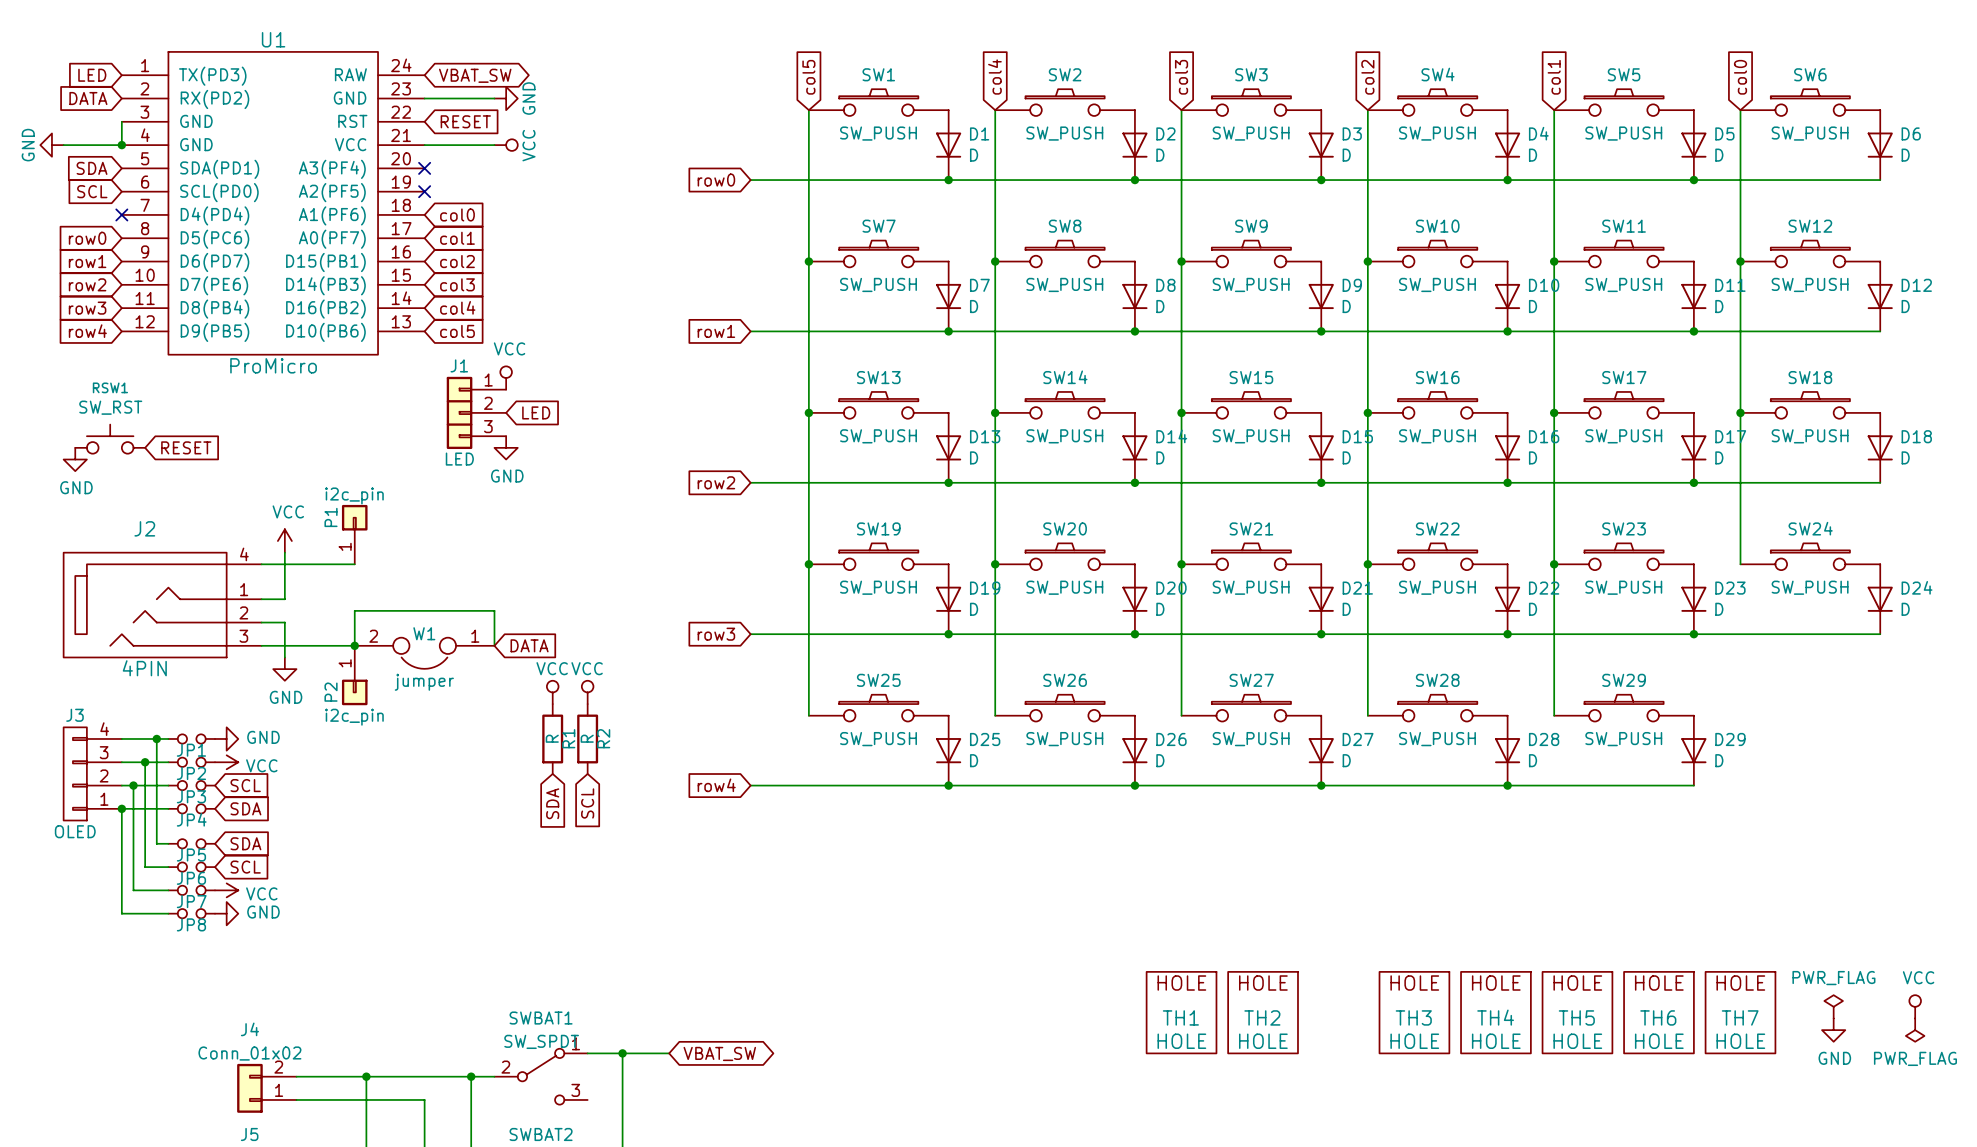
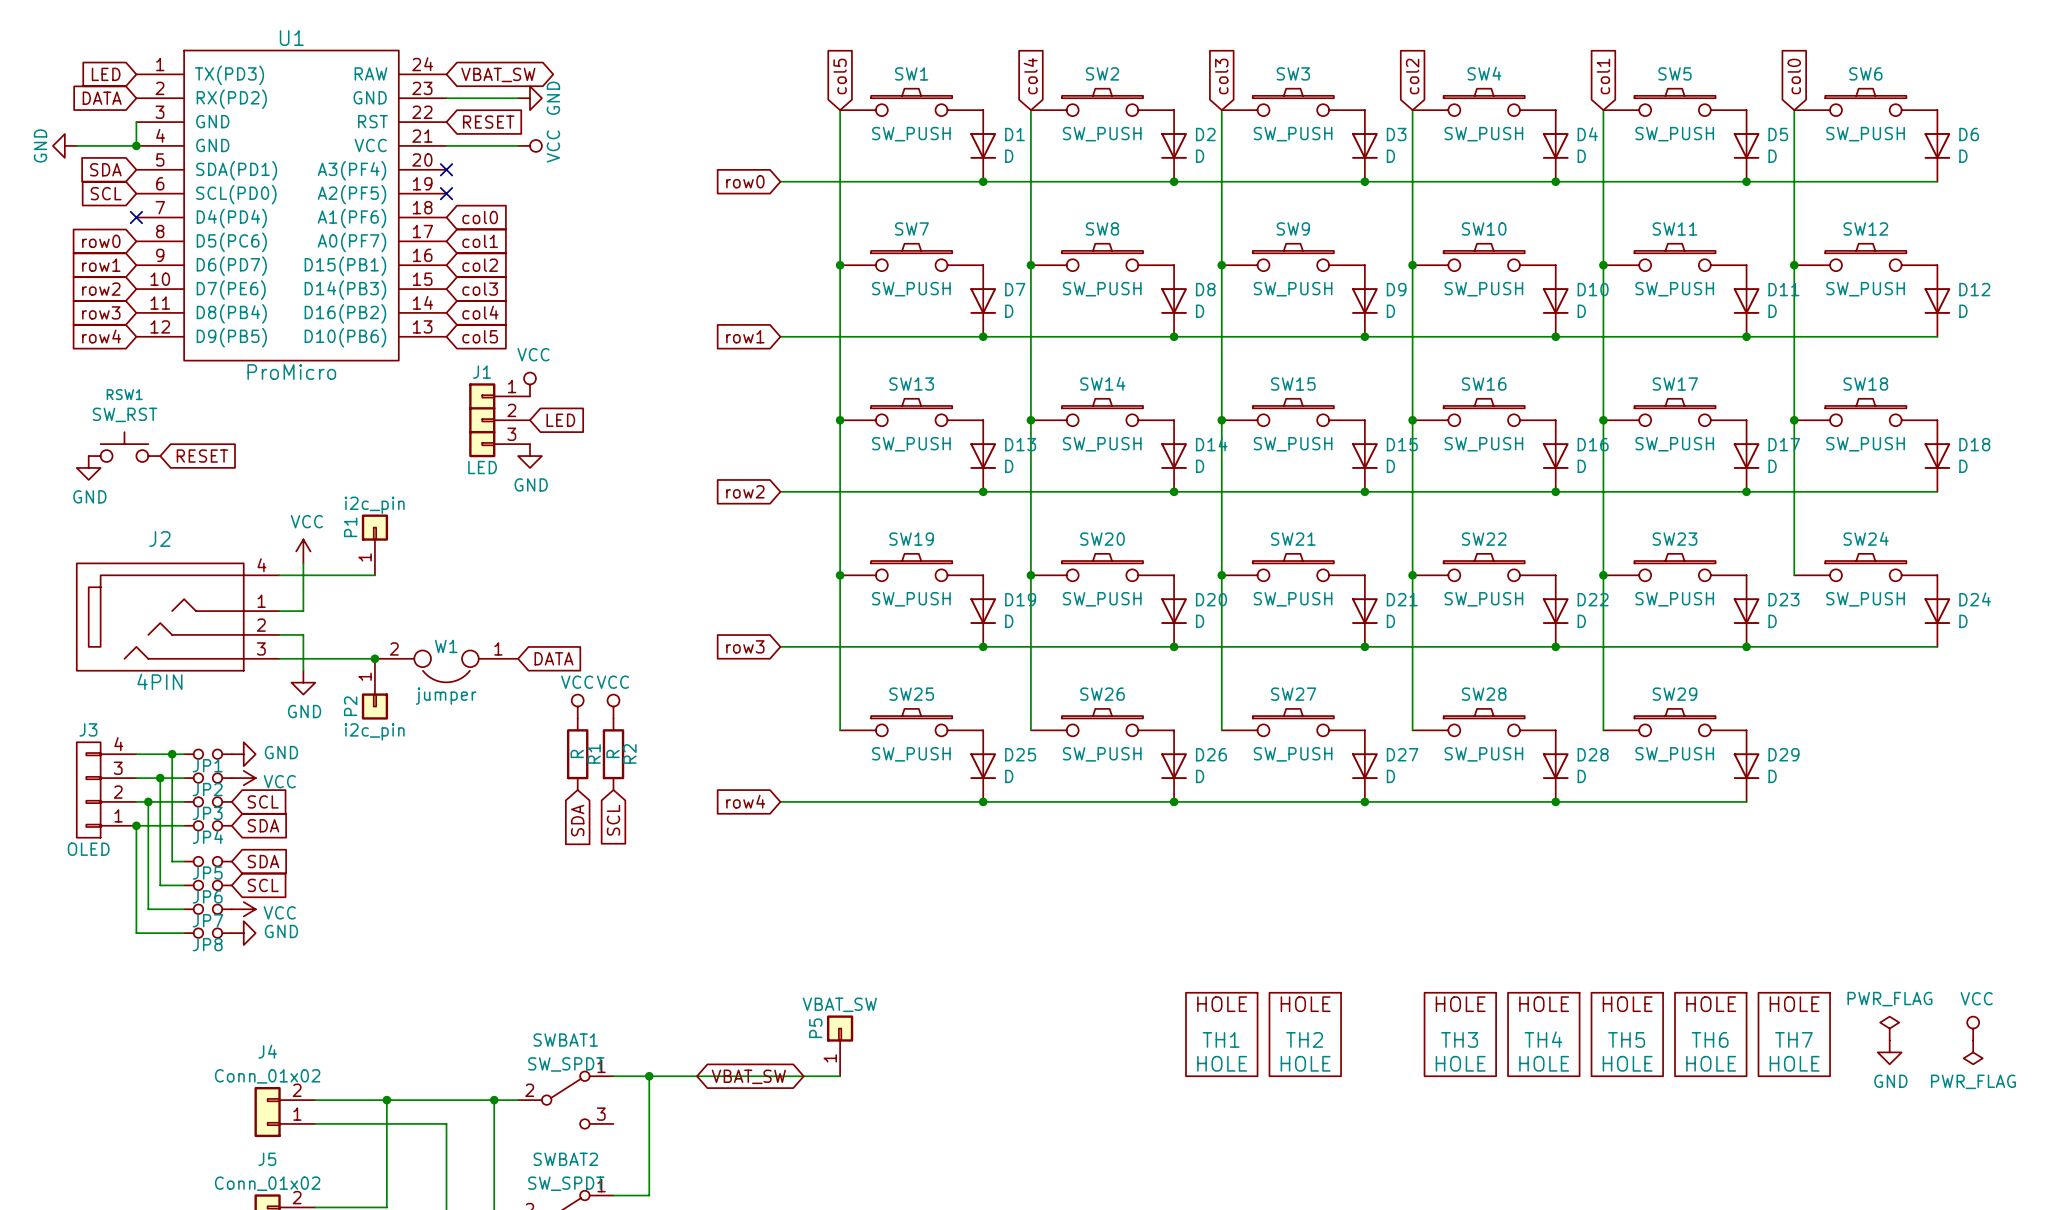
wire: (354, 645) (354, 610) (494, 610) (494, 645) -> none
P5: none -> VBAT_SW (840, 1045)
wire: none -> (696, 1076) (840, 1076)

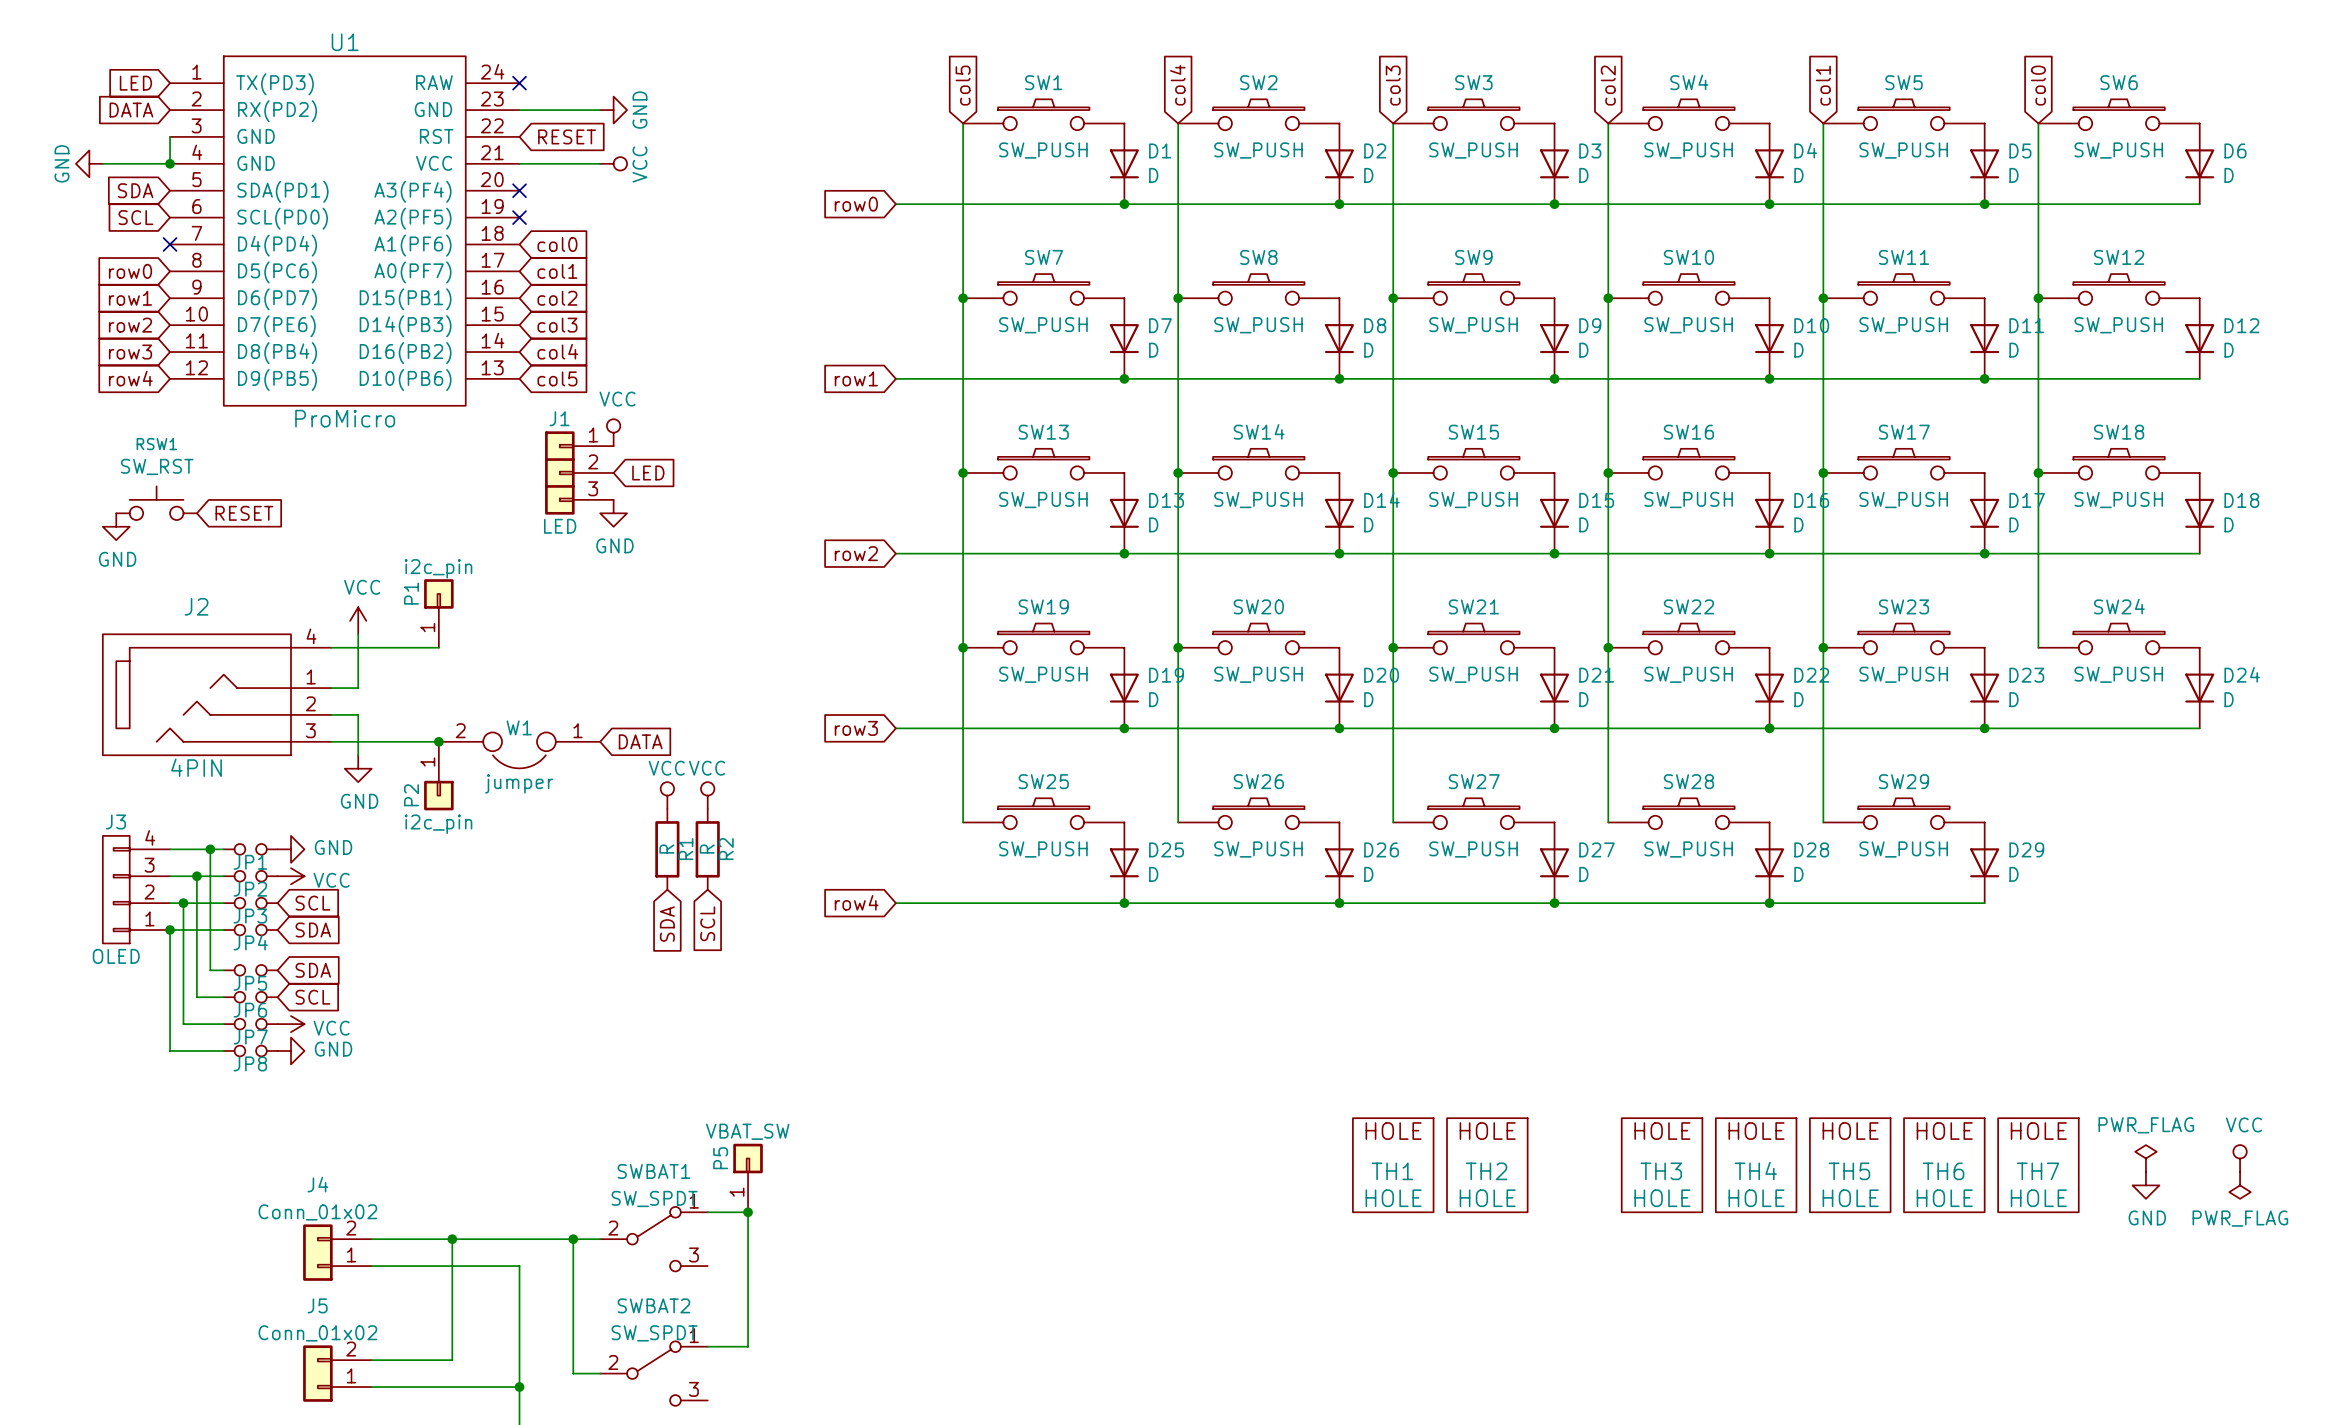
no-connect mark: none -> (519, 83)
global label: VBAT_SW (498, 74) -> none
P5 position: (840, 1045) -> (748, 1178)
wire: (649, 1076) (840, 1076) -> none
global label: VBAT_SW (748, 1076) -> none

